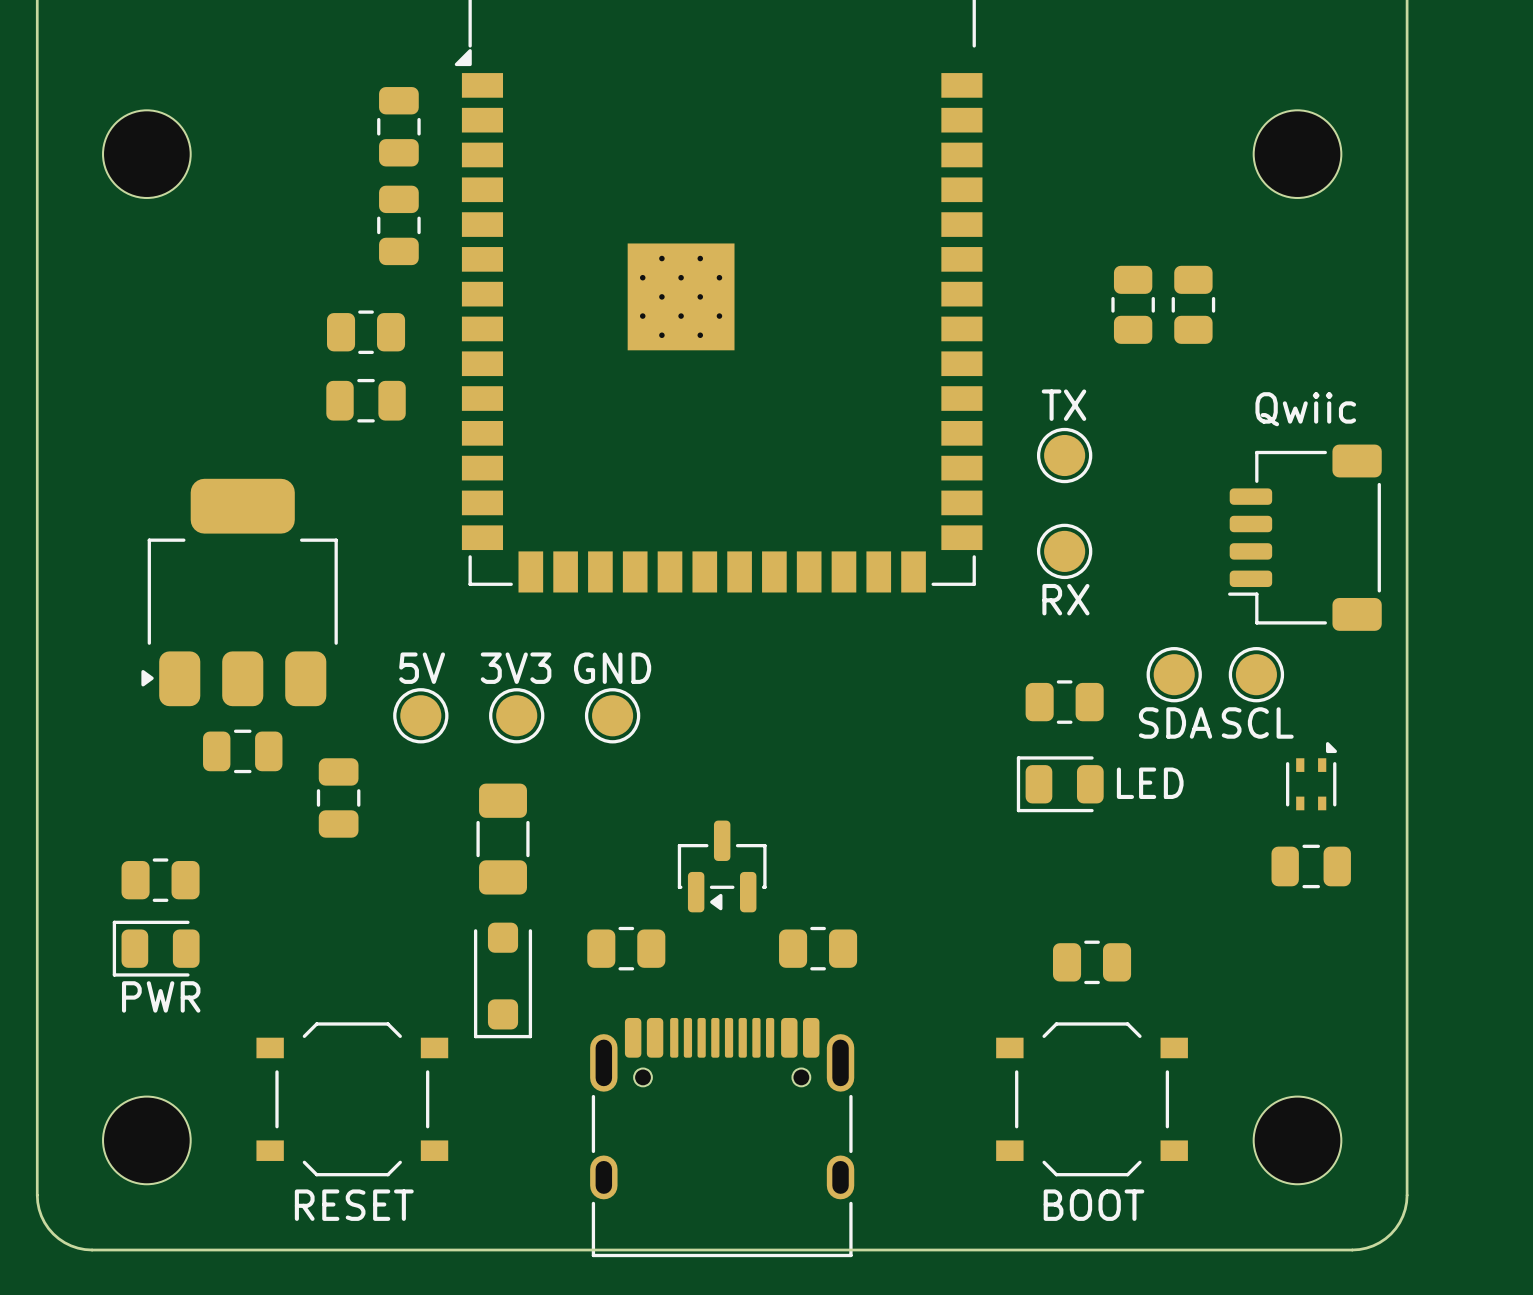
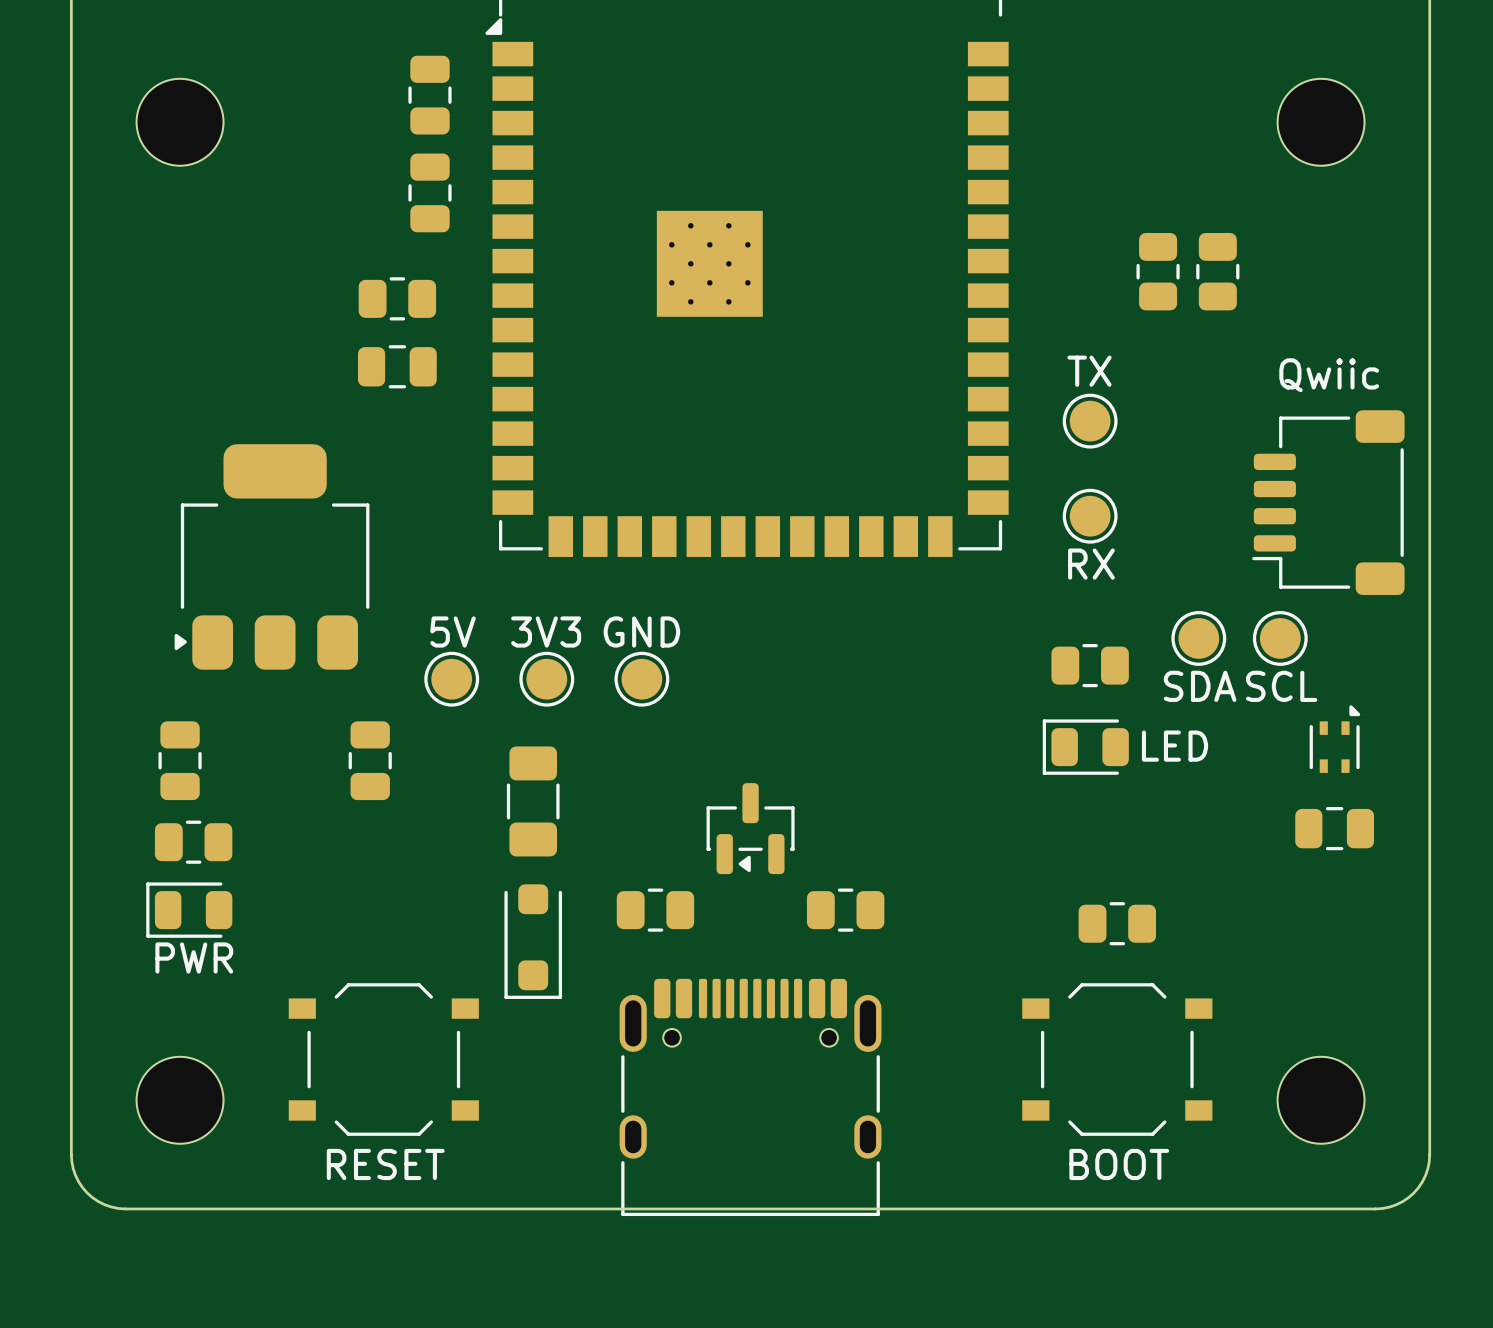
part rotation: 0° (242, 751) -> 90° clockwise (180, 760)
part position: (242, 751) -> (180, 760)

